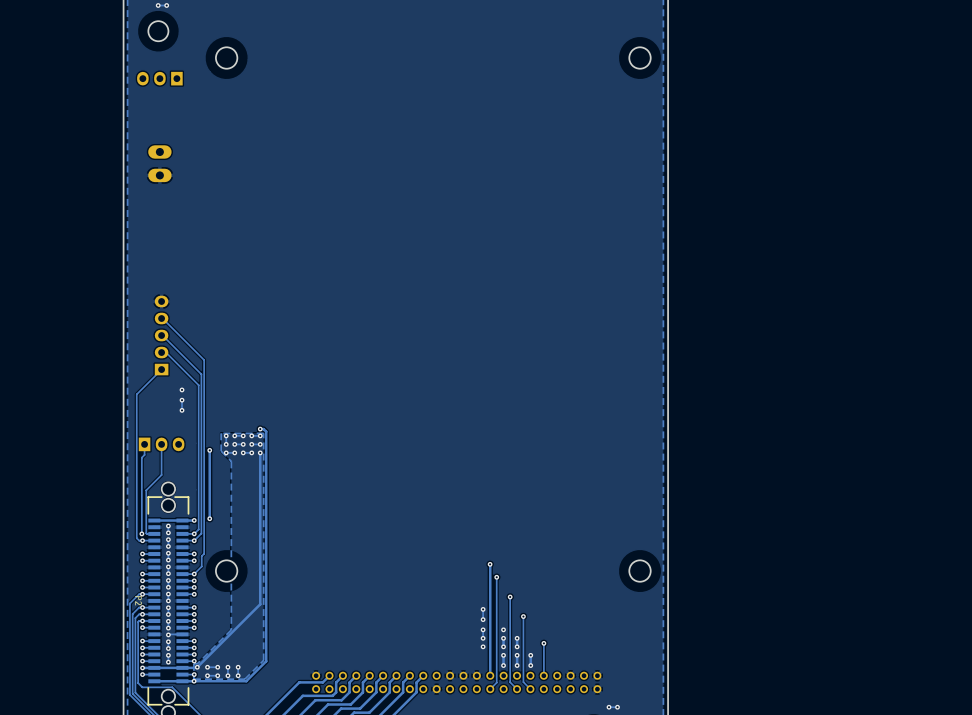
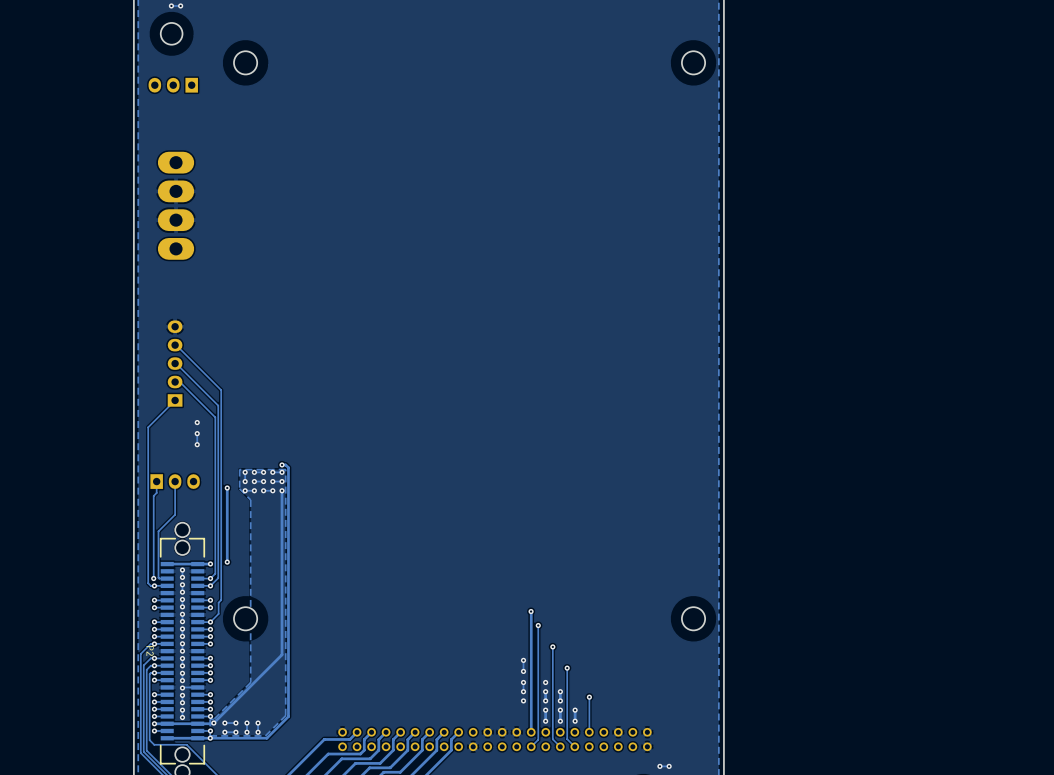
part: (159, 163) -> none
part: none -> (176, 205)

